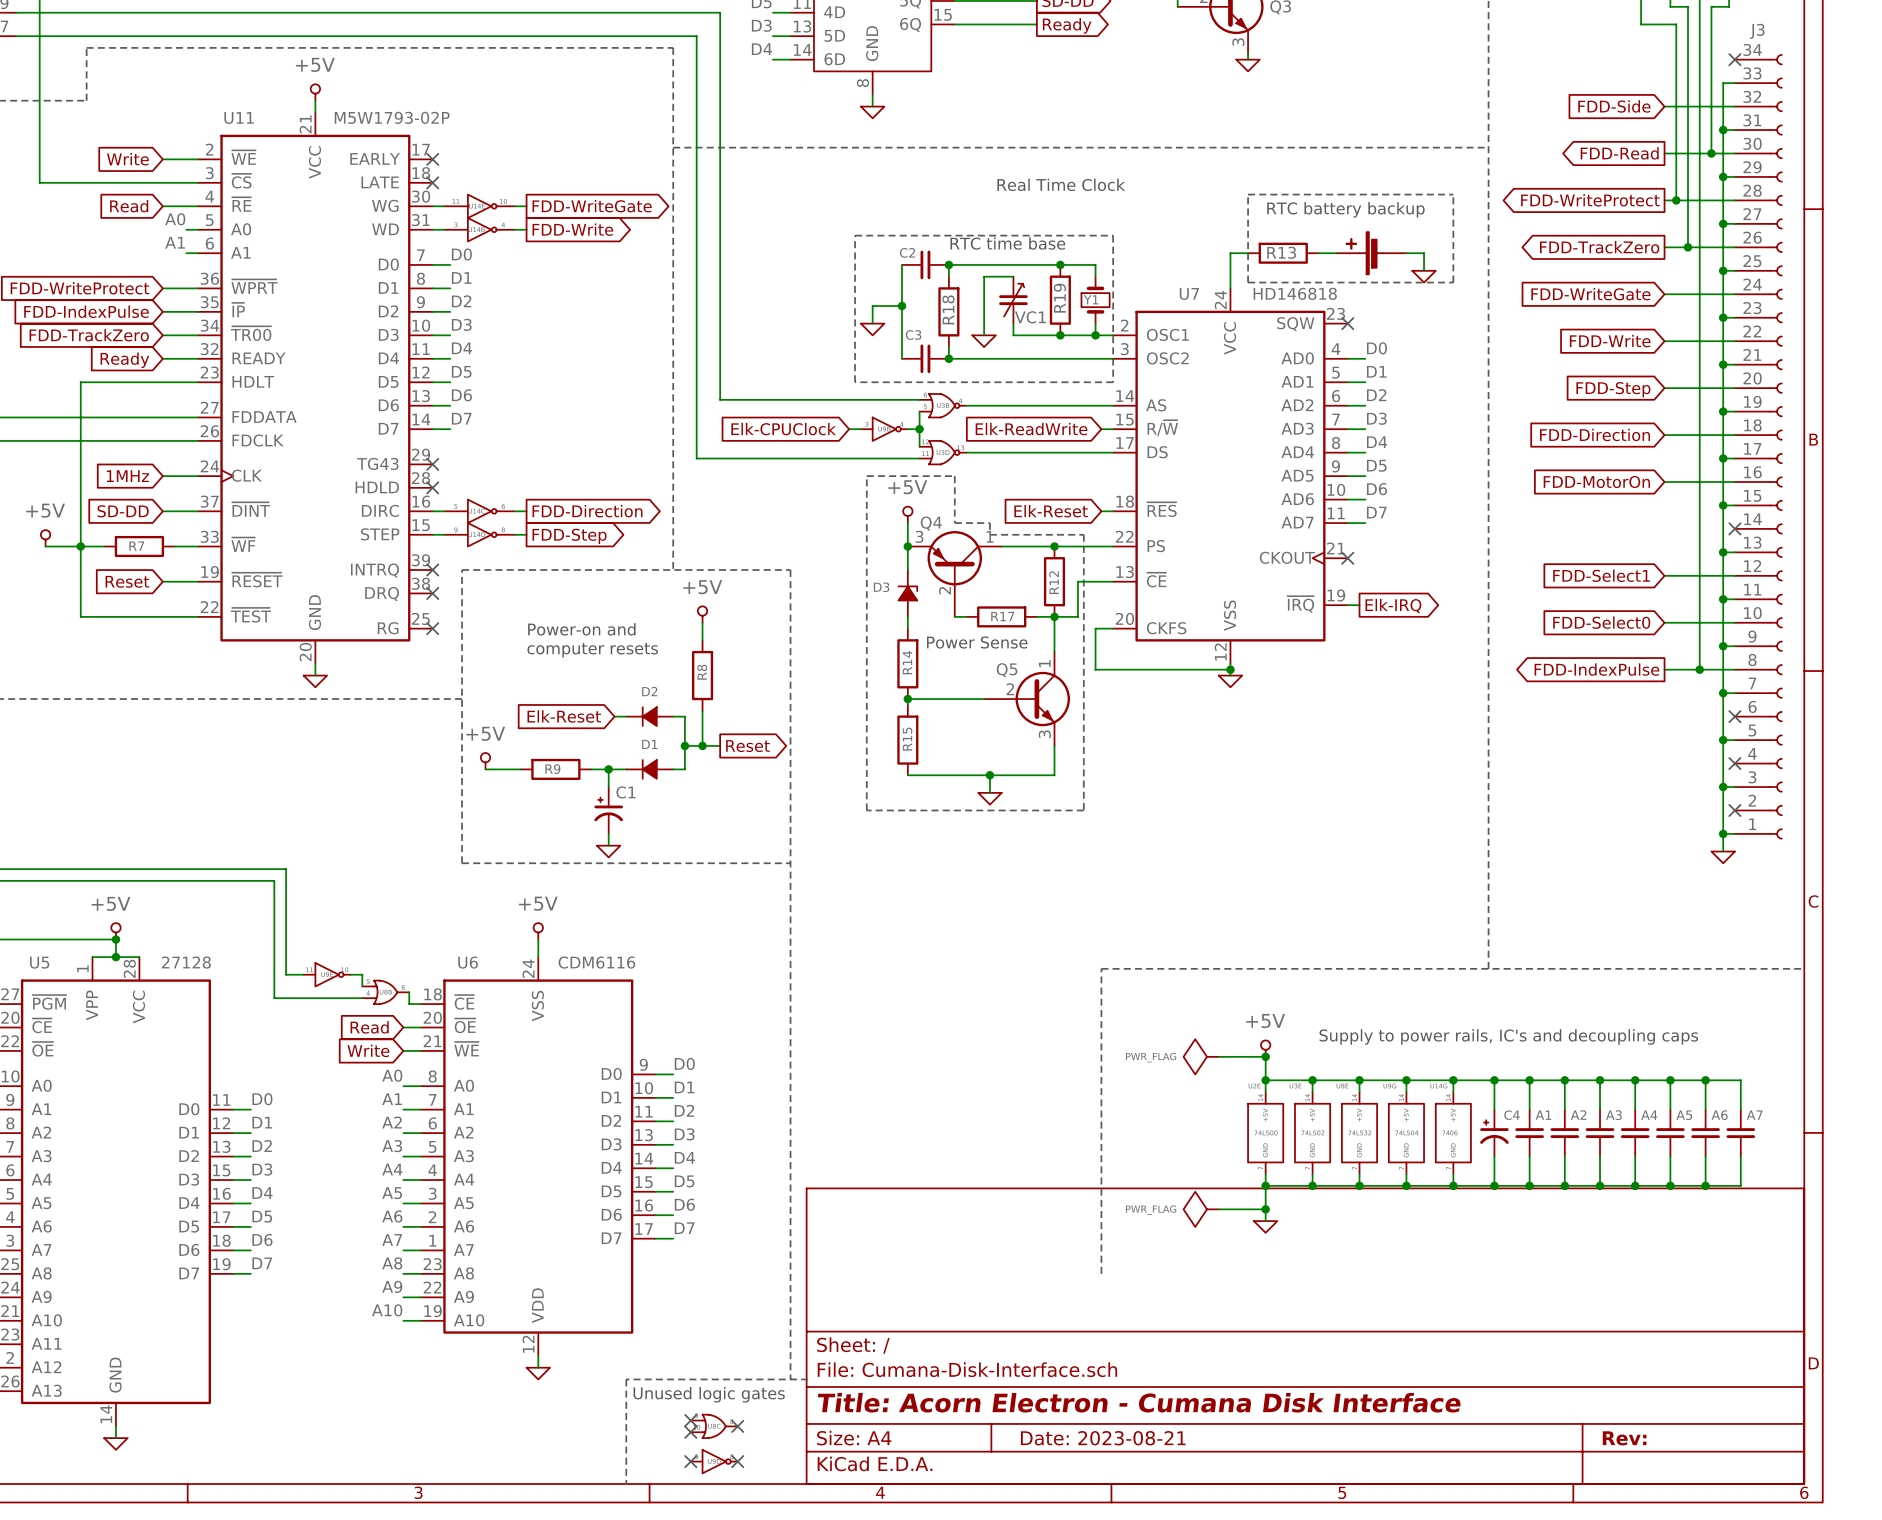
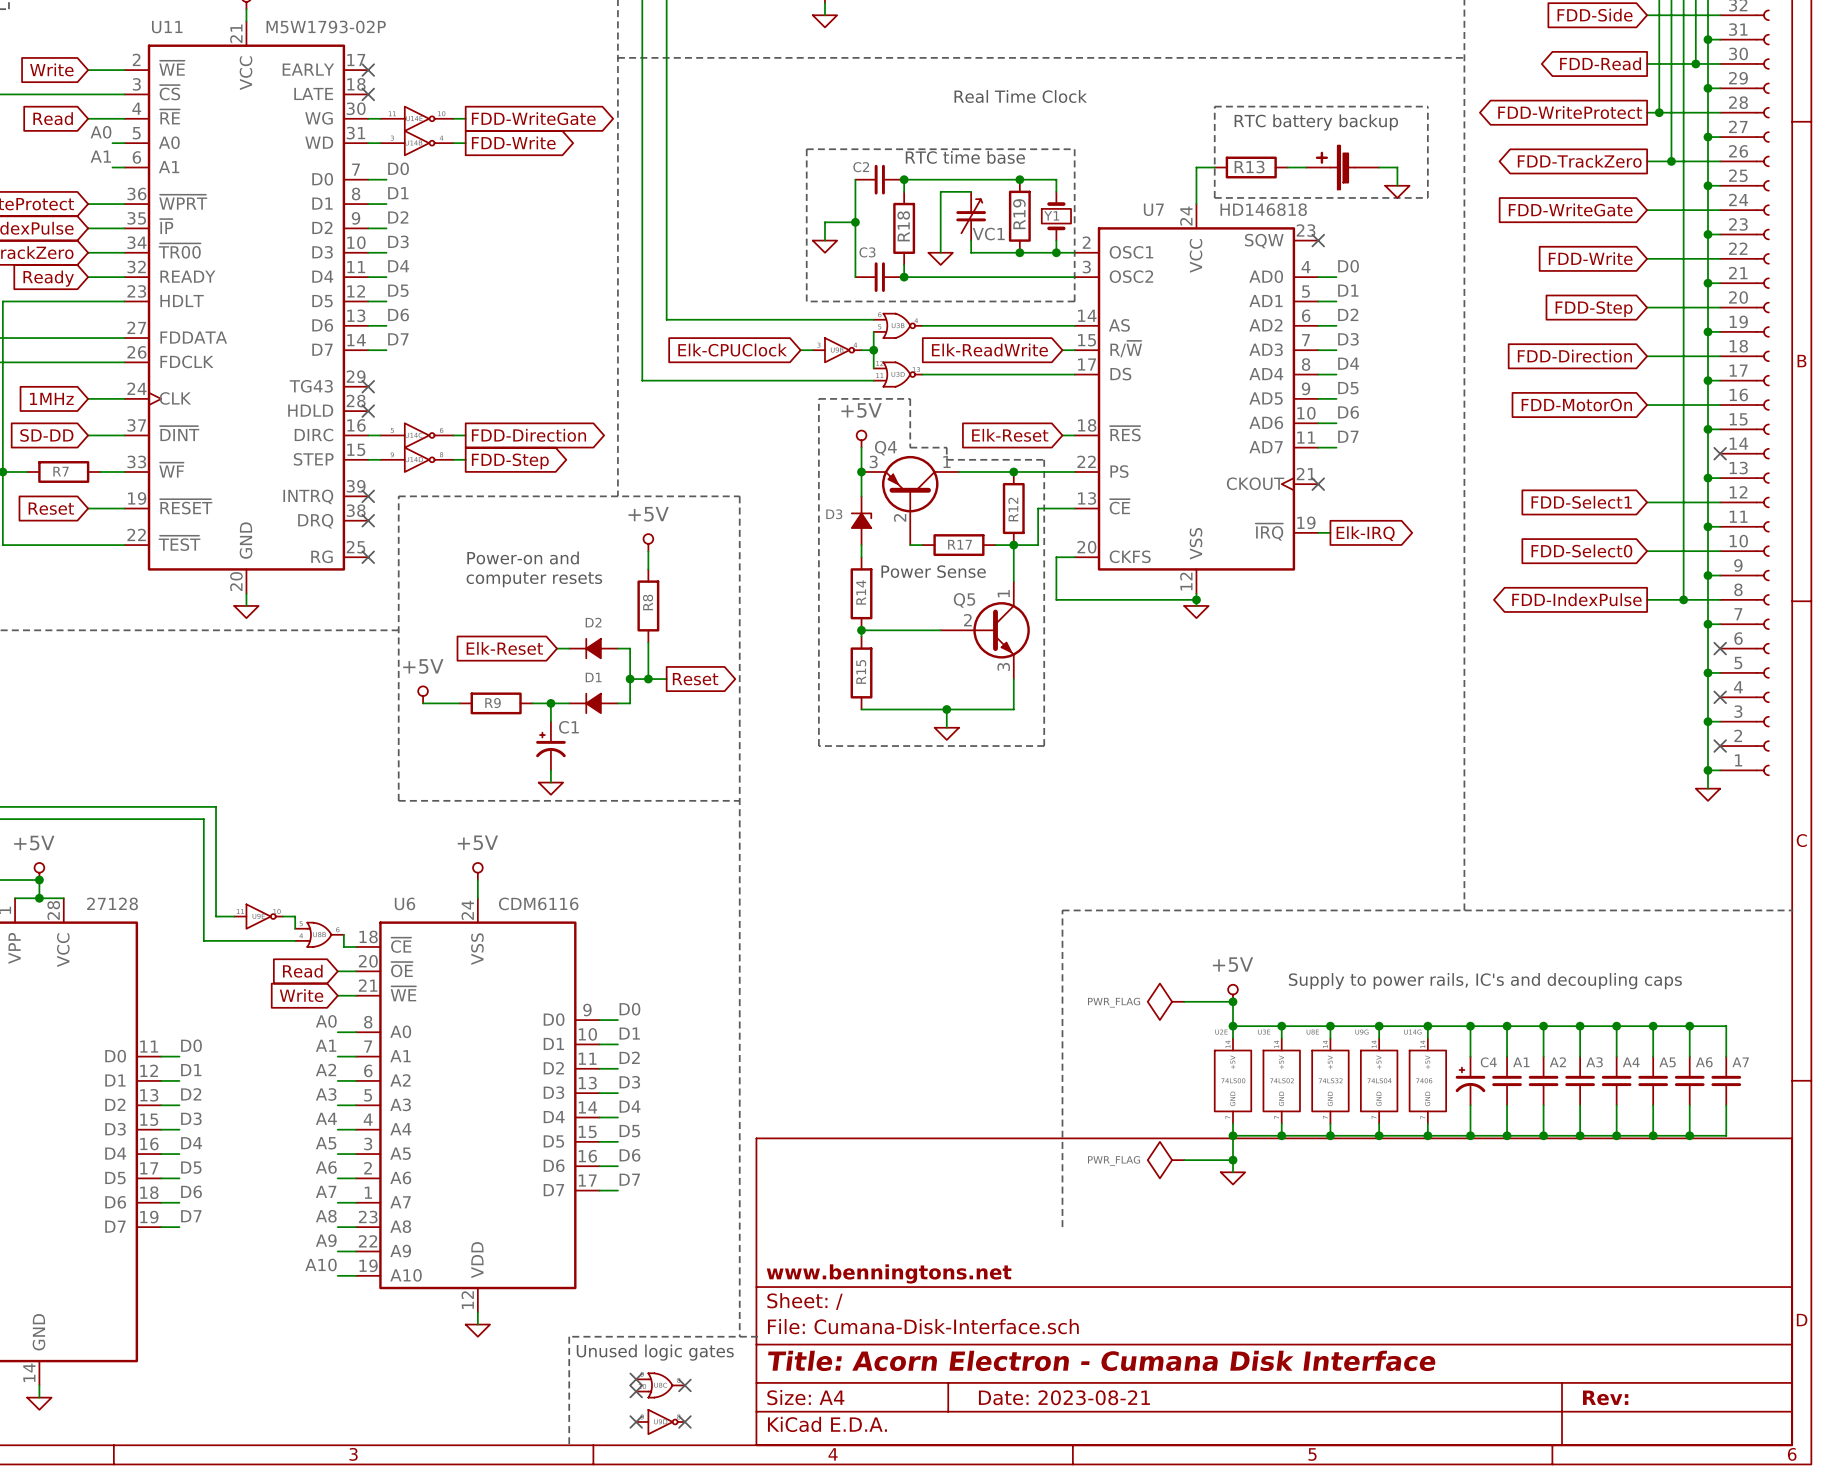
title block: none -> www.benningtons.net (889, 1273)

